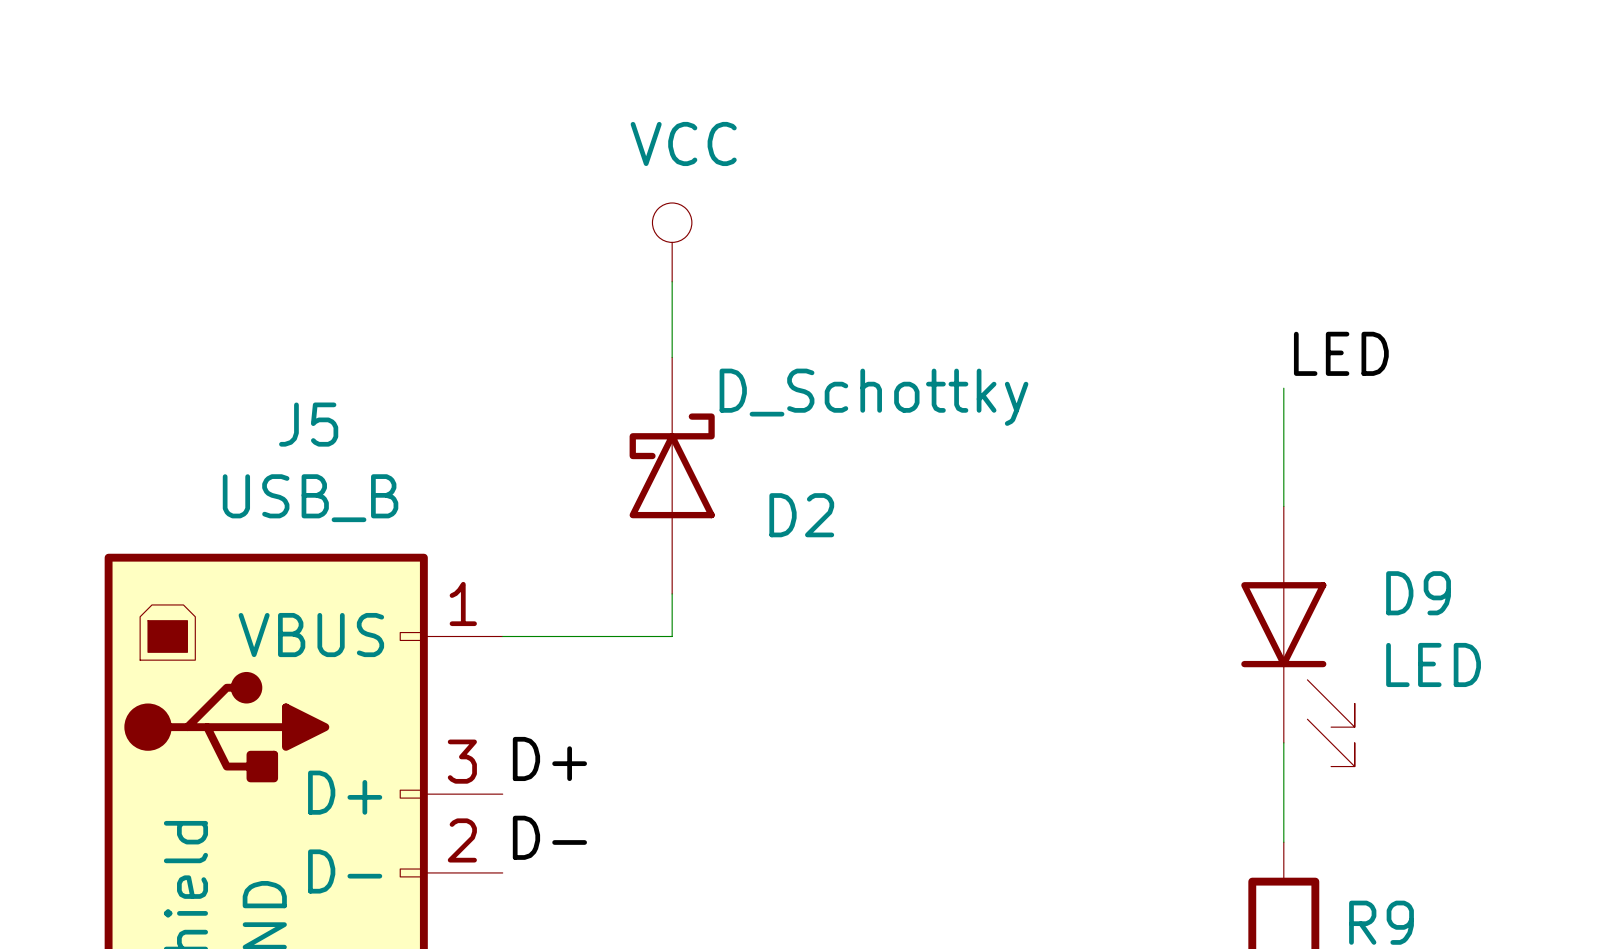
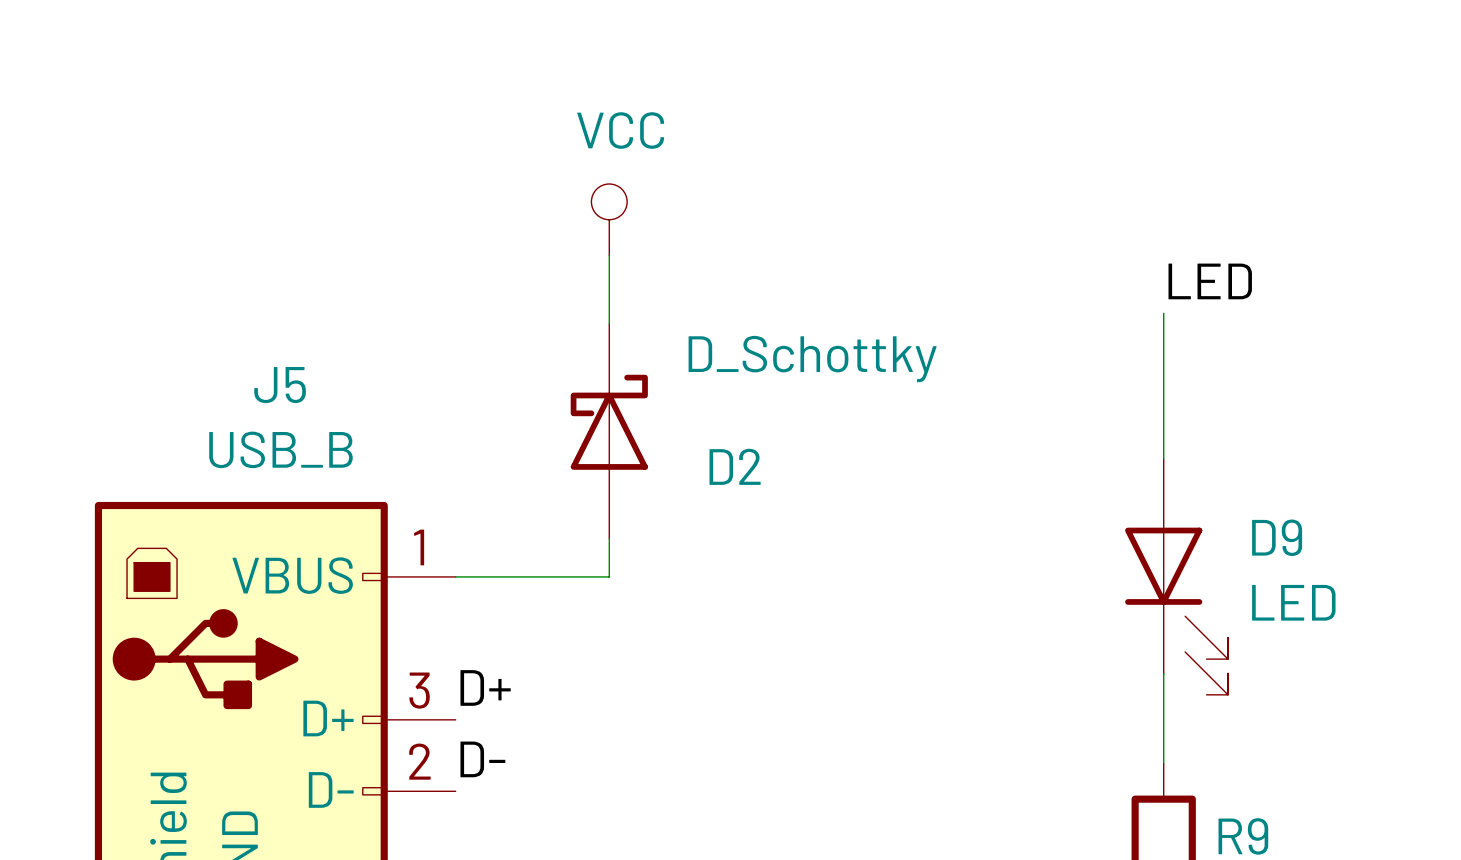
wire: none -> (1163, 313) (1163, 351)
label position: LED (1341, 353) -> LED (1210, 281)

